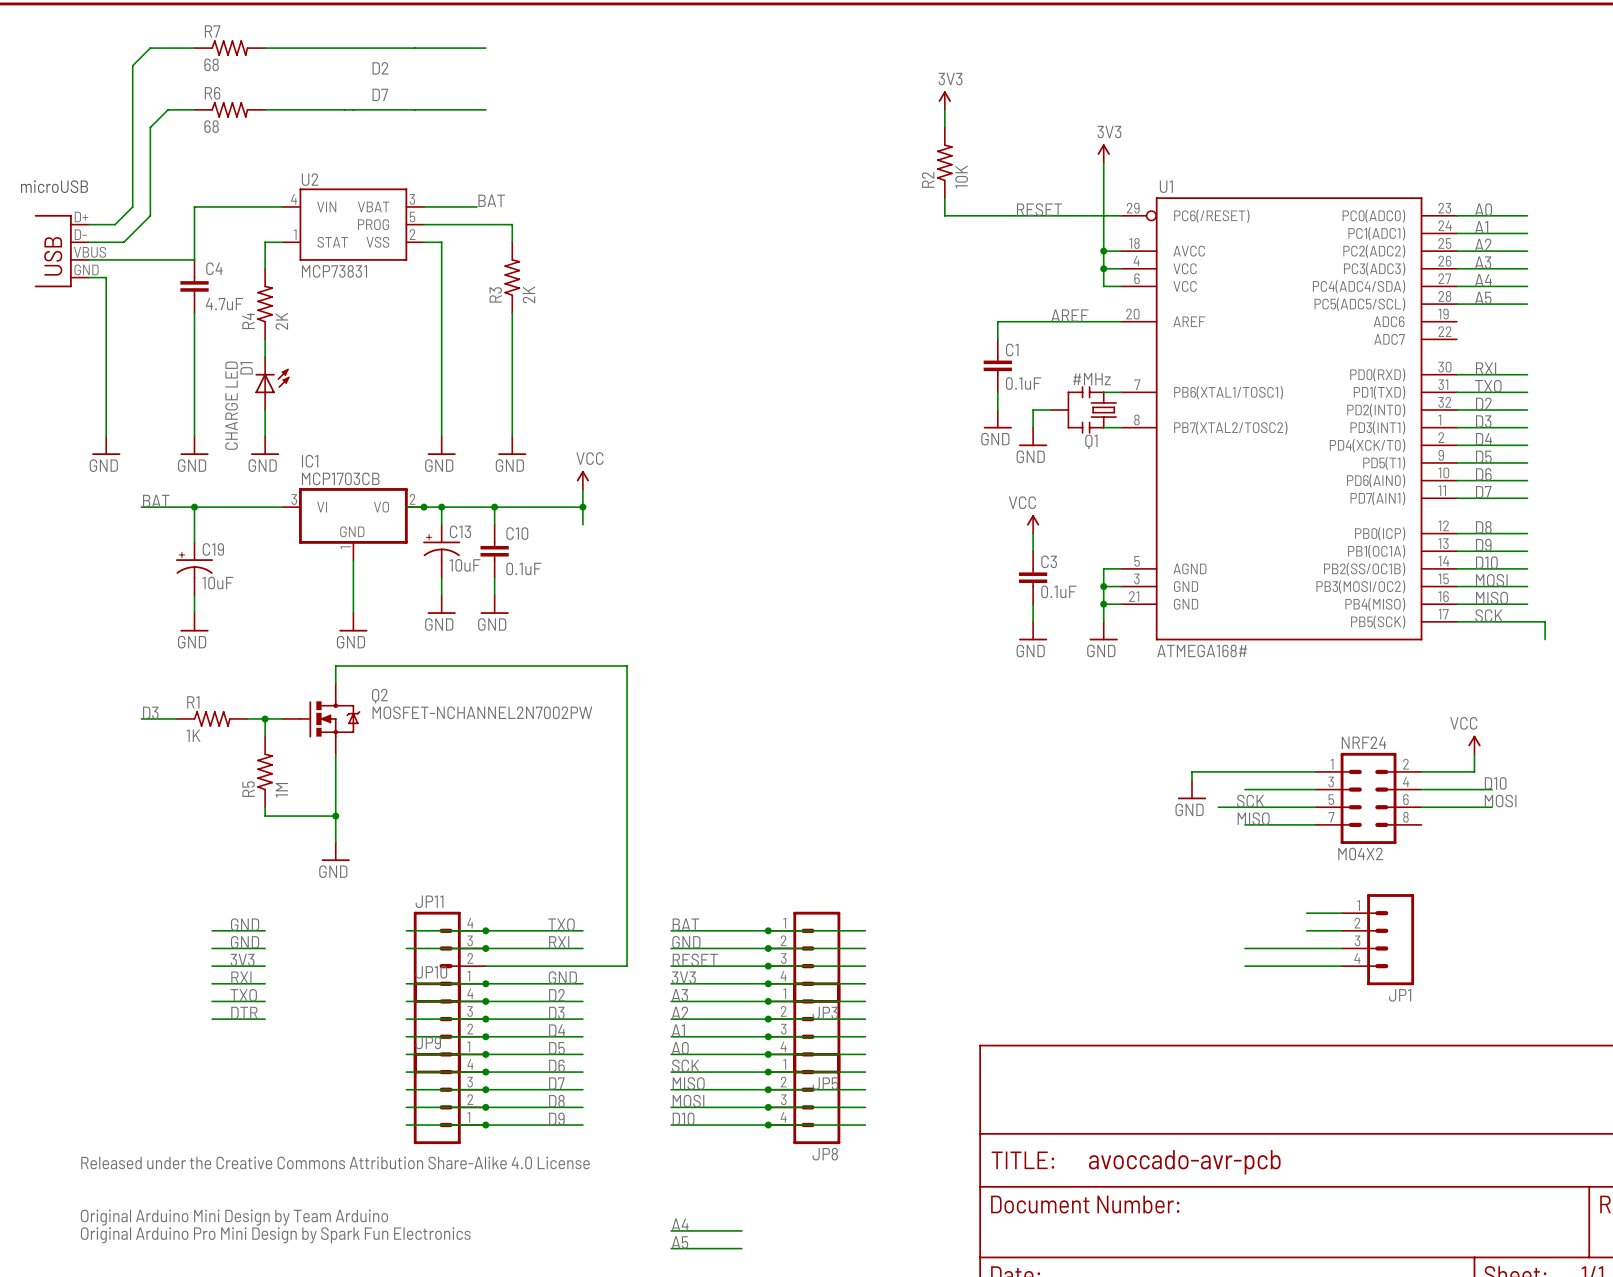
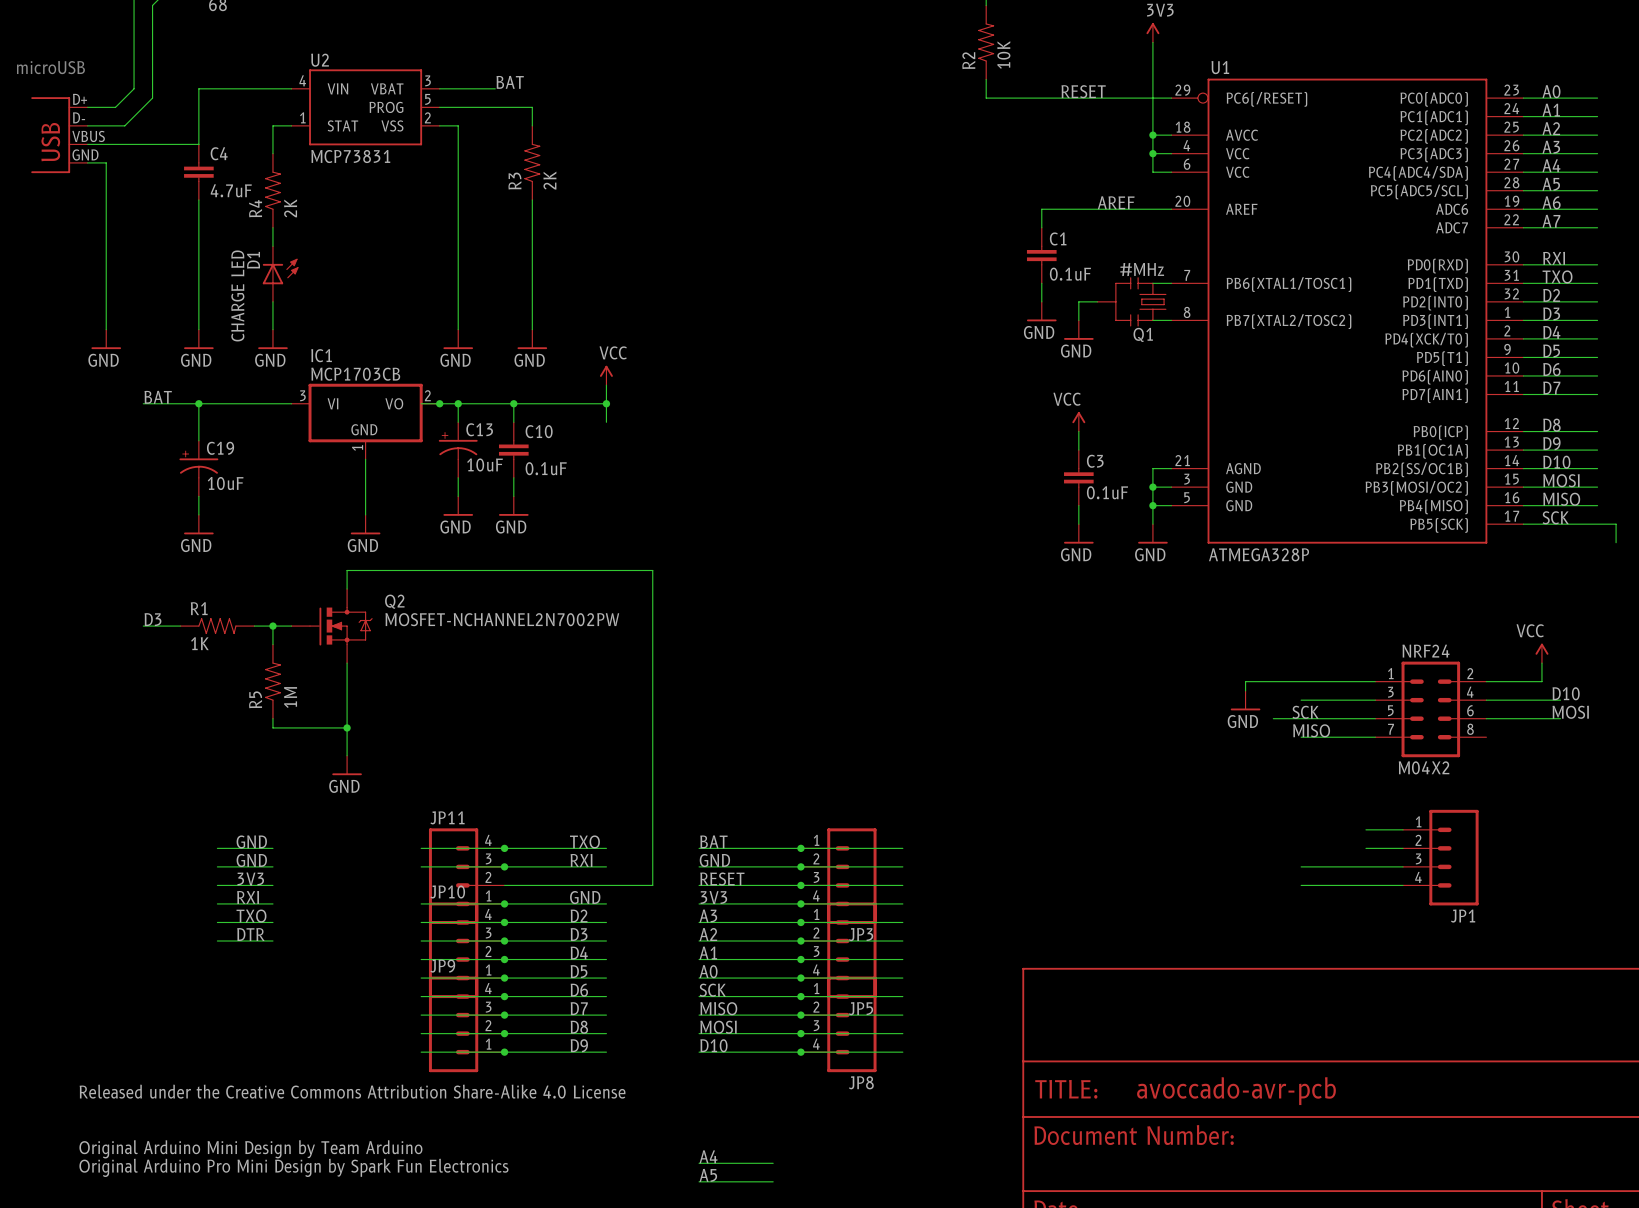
label: none -> A6 (1551, 202)
wire: none -> (1523, 209) (1597, 209)
label: none -> A7 (1551, 221)
wire: none -> (1523, 227) (1597, 227)
U1 pin number: 5 (1137, 561) -> 21 (1182, 460)
U1 pin number: 21 (1134, 596) -> 5 (1187, 497)
U1 value: ATMEGA168# (1202, 650) -> ATMEGA328P (1259, 554)

